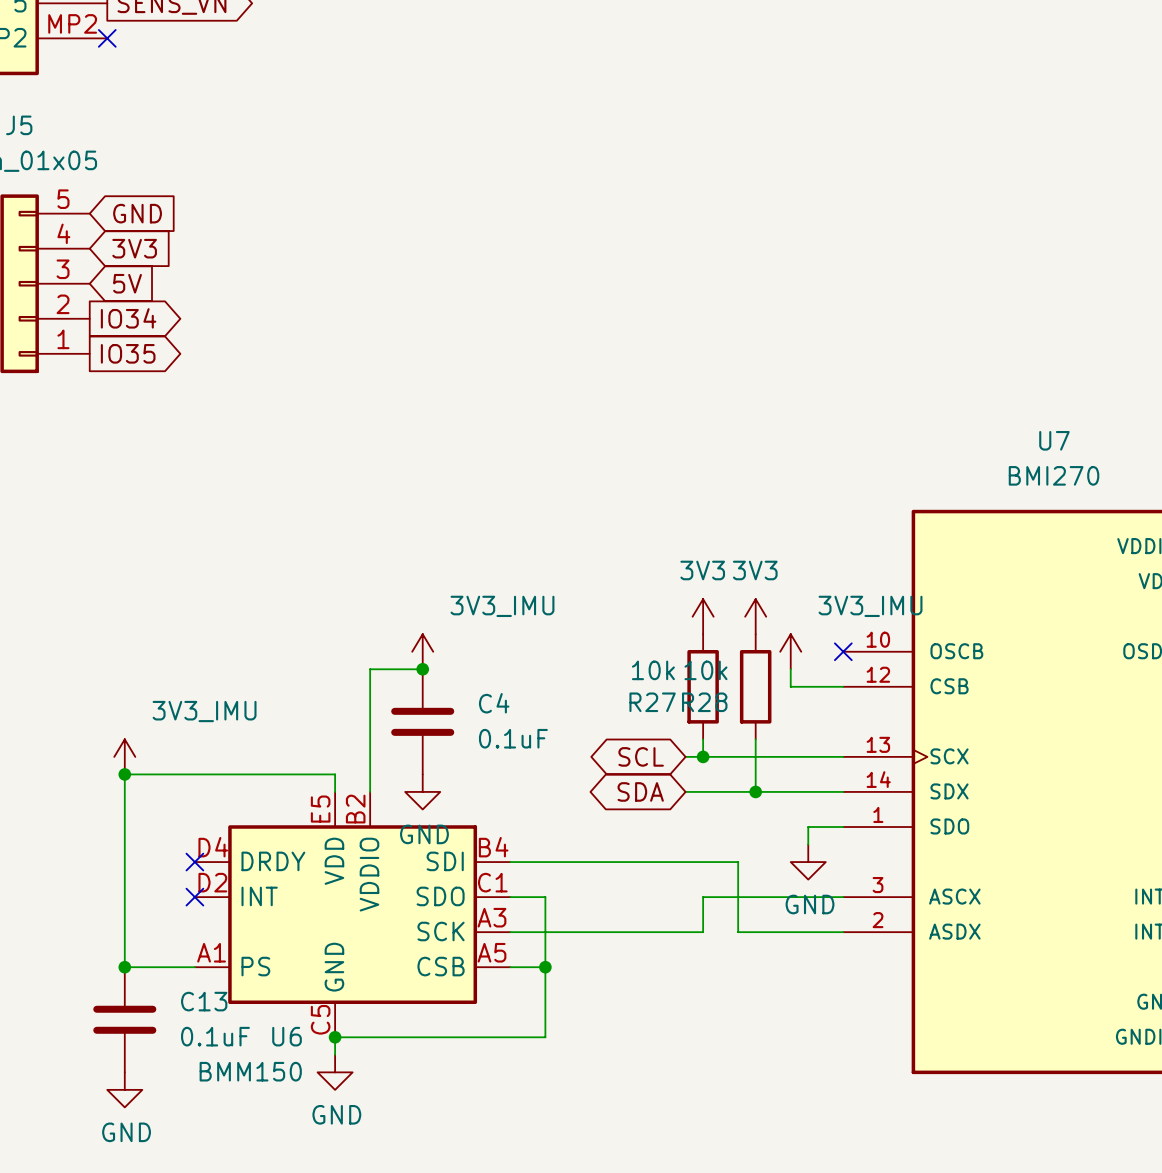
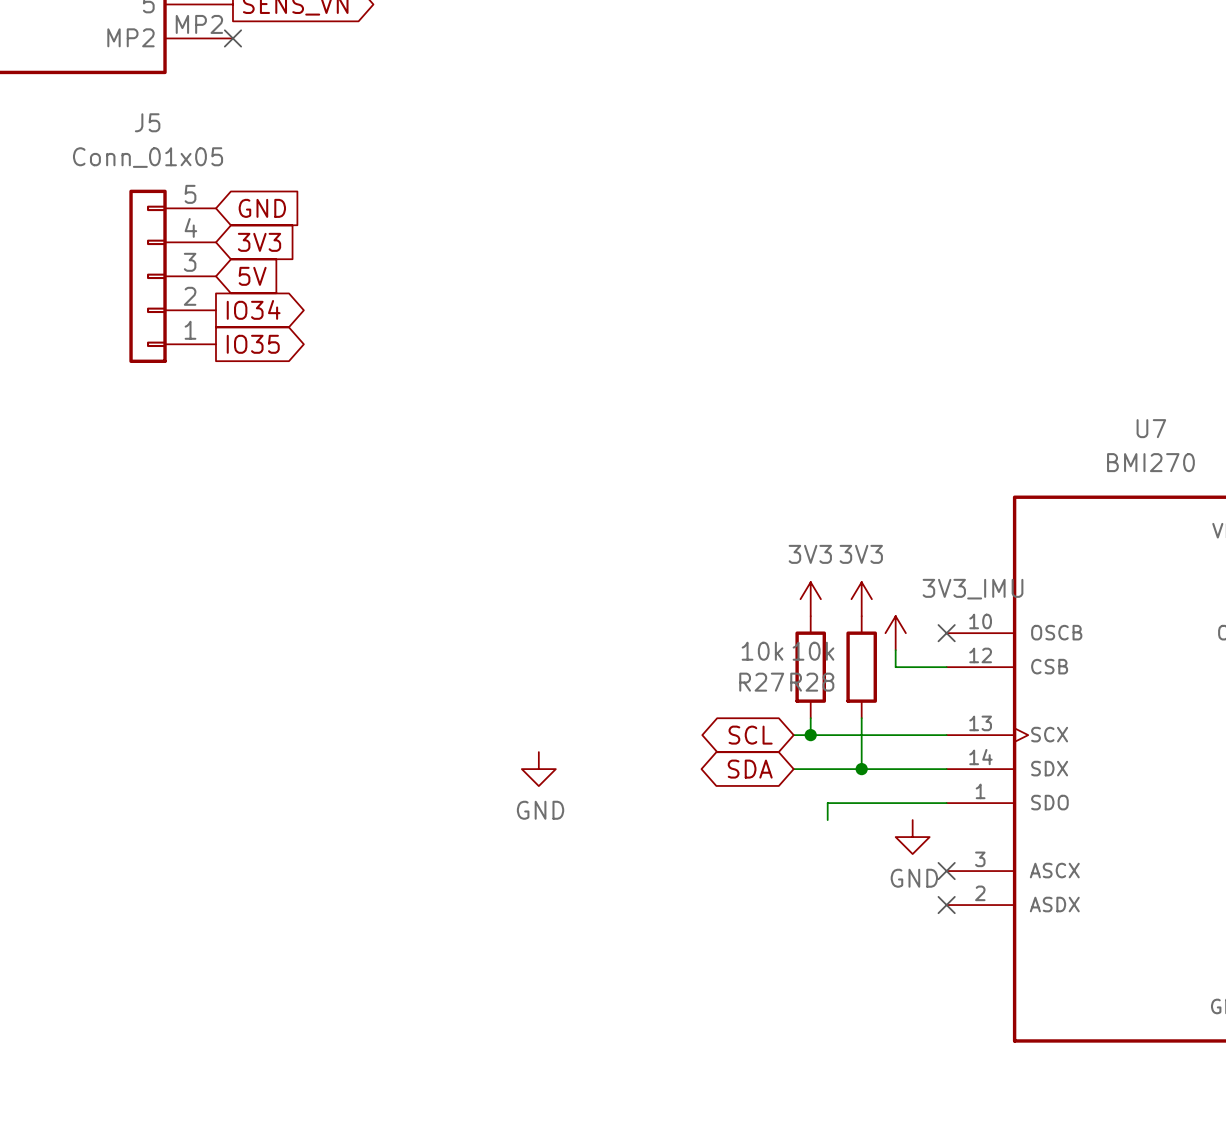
power symbol: 3V3_IMU (422, 651) -> none
wire: (422, 669) (370, 669) (370, 791) -> none
junction: (422, 669) -> none
C4: 0.1uF (422, 721) -> none
power symbol: 3V3_IMU (124, 756) -> none
junction: (124, 774) -> none
wire: (335, 791) (335, 774) (124, 774) (124, 967) (194, 967) -> none
wire: (808, 827) (808, 844) -> (912, 803) (827, 803) (827, 820)
no-connect mark: (194, 862) -> none
wire: (510, 862) (738, 862) (738, 932) (843, 932) -> none
no-connect mark: (194, 897) -> none
wire: (510, 897) (545, 897) (545, 1037) (335, 1037) (335, 1054) -> none
wire: (843, 897) (703, 897) (703, 932) (510, 932) -> none
no-connect mark: none -> (946, 871)
U6: BMM150 (352, 914) -> none
no-connect mark: none -> (946, 905)
junction: (124, 967) -> none
wire: (510, 967) (545, 967) -> none
junction: (545, 967) -> none
C13: 0.1uF (124, 1019) -> none
junction: (335, 1037) -> none
power symbol: GND (335, 1072) -> none
power symbol: GND (124, 1089) -> none

